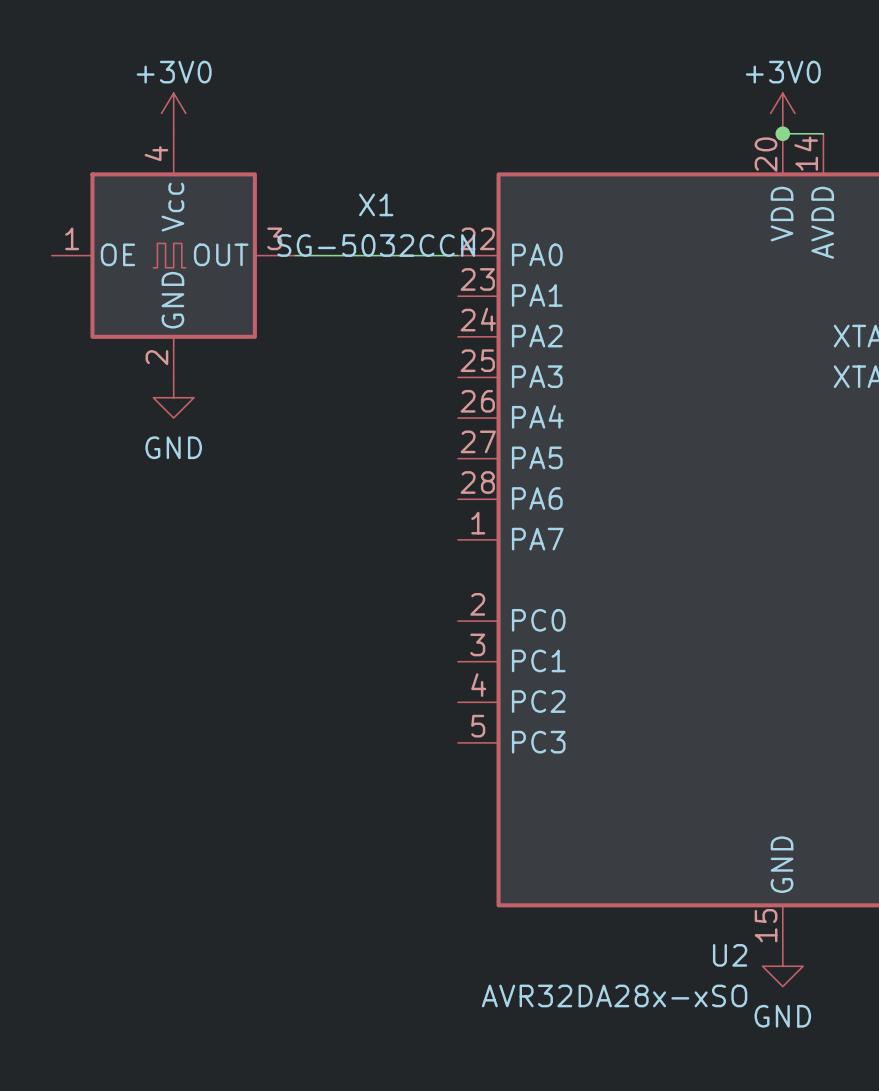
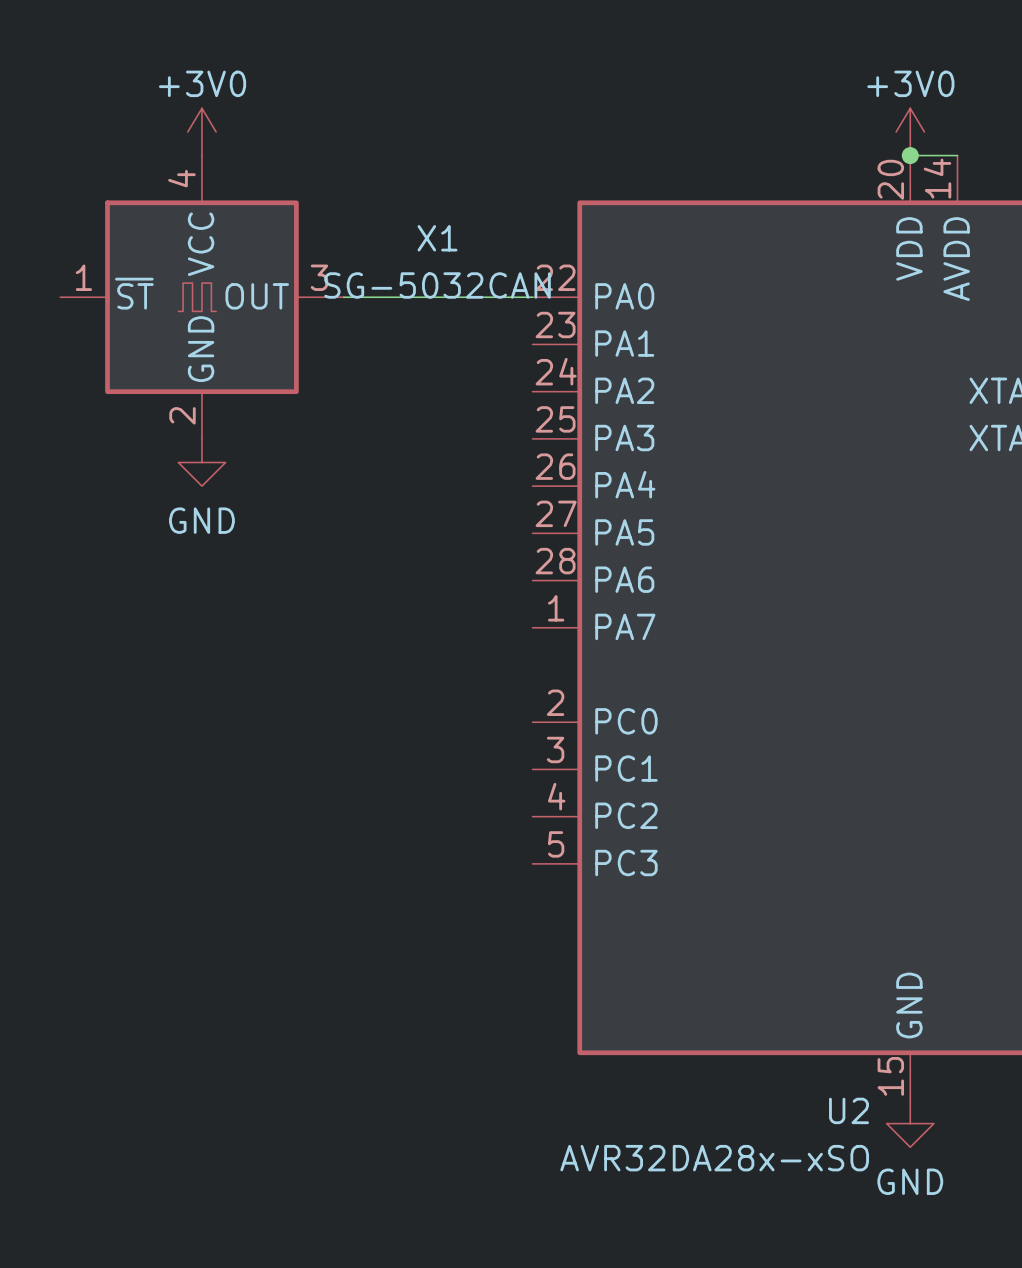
X1 pin name: Vcc (172, 207) -> VCC (201, 244)
X1 value: SG-5032CCN (376, 245) -> SG-5032CAN (437, 285)
X1 pin name: OE (117, 254) -> ~{ST} (134, 293)

